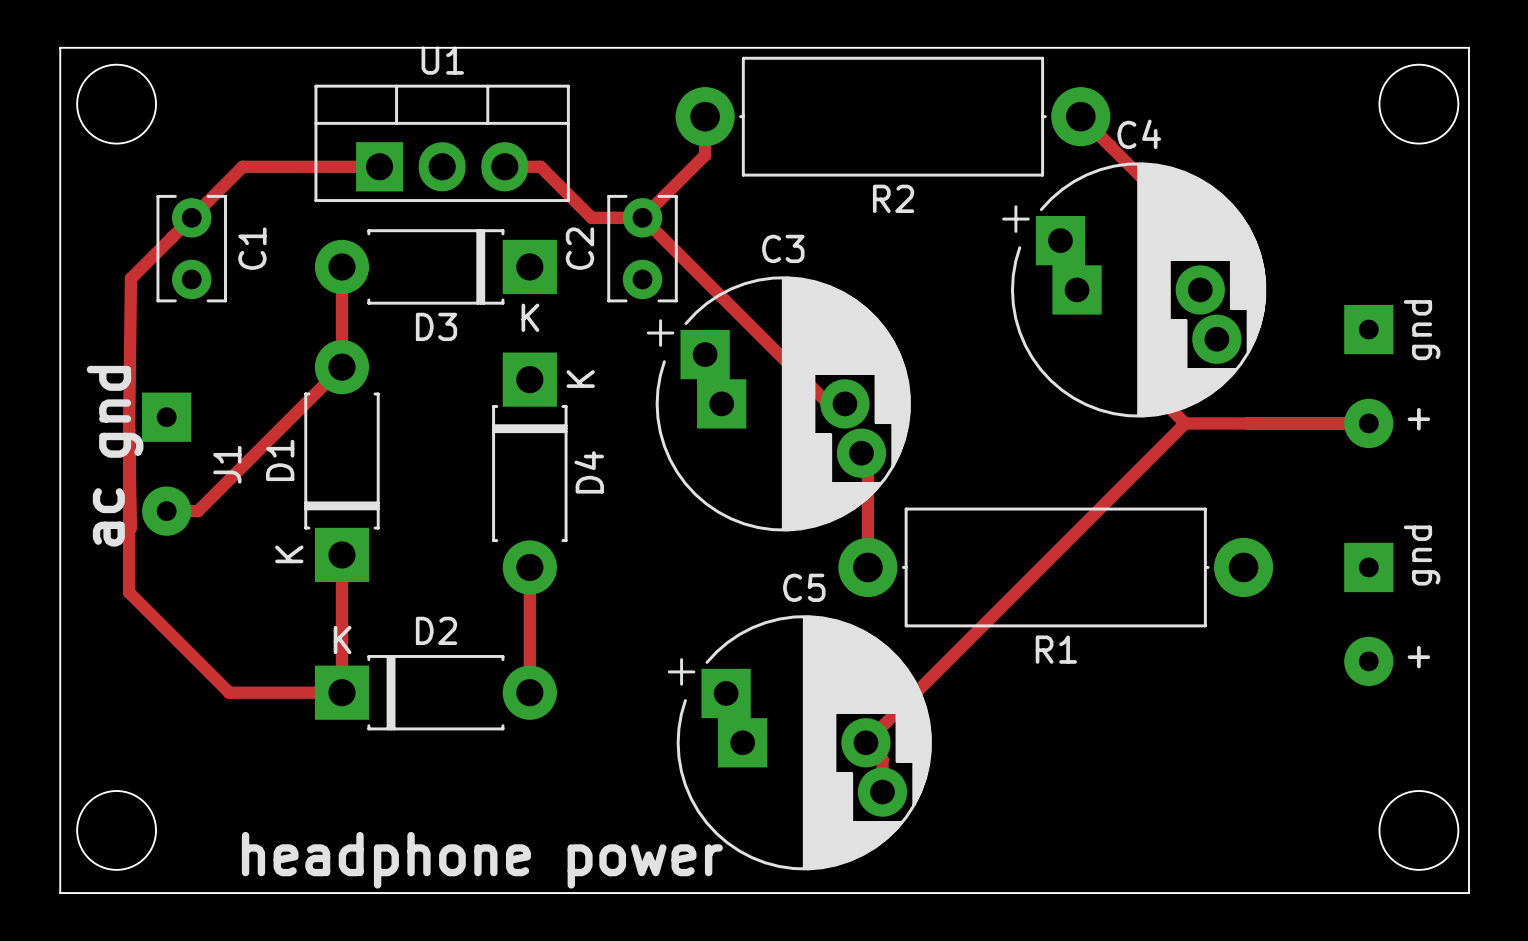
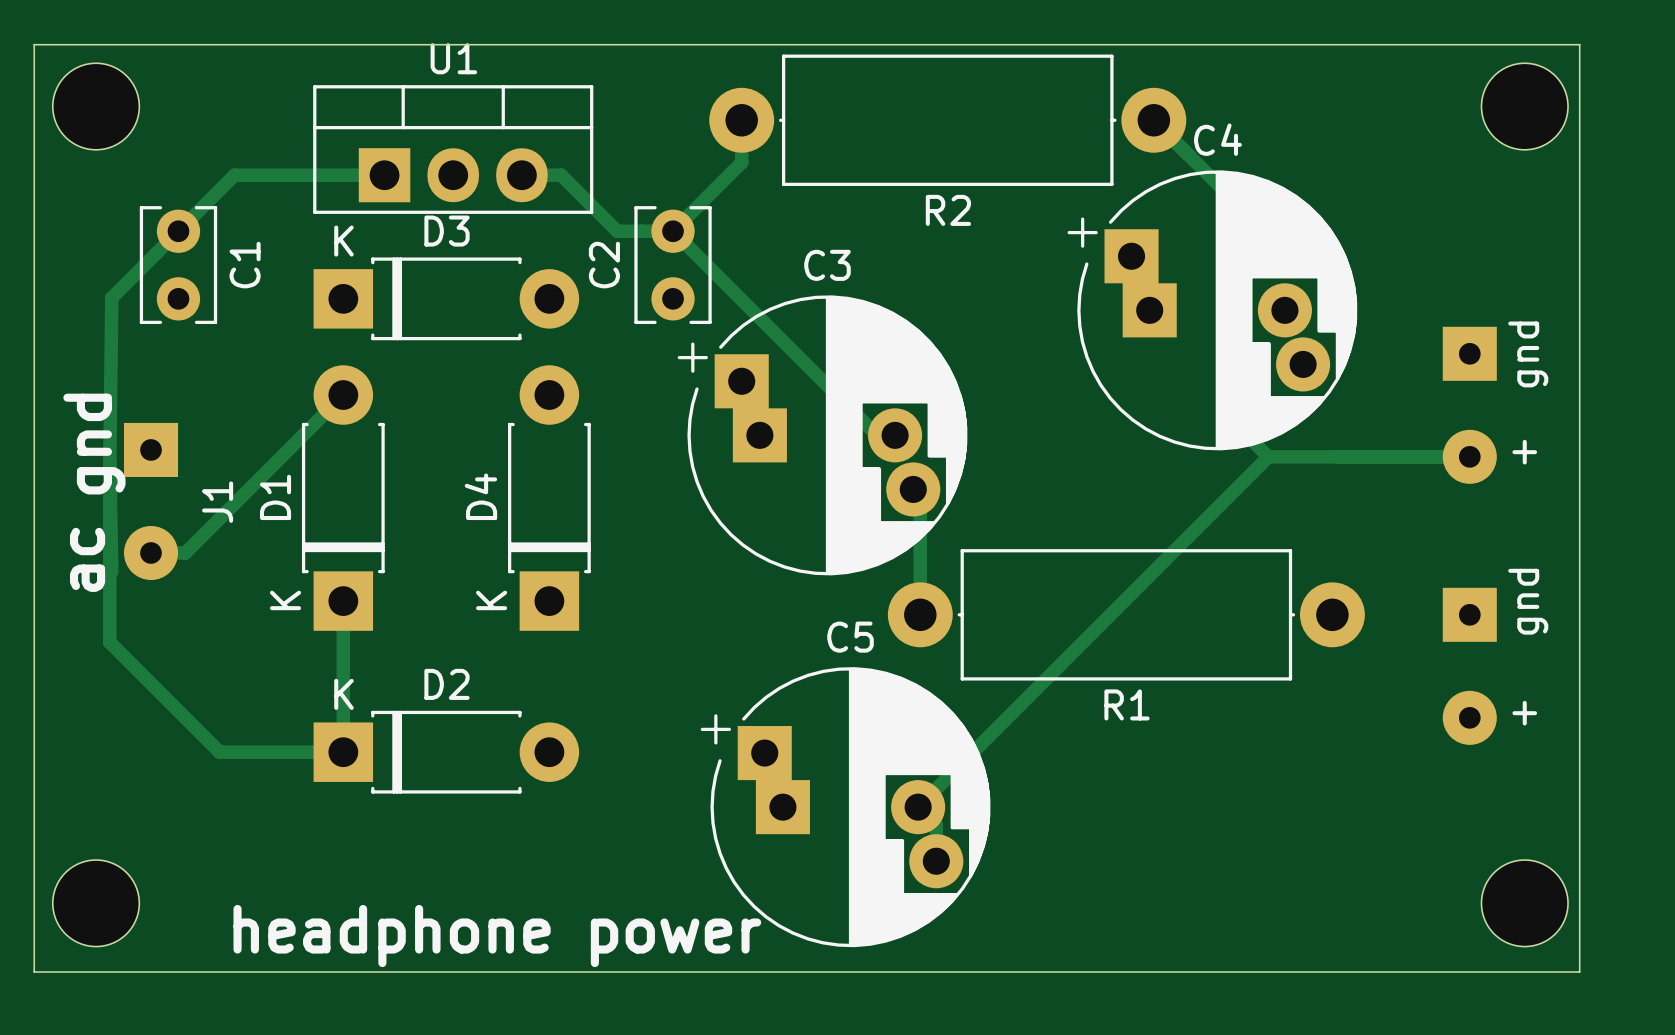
track: (341, 266) (341, 367) -> none
D3 rotation: 0° (435, 266) -> 180° (446, 298)
D4 rotation: 0° (529, 473) -> 180° (549, 498)
track: (529, 567) (529, 692) -> none

